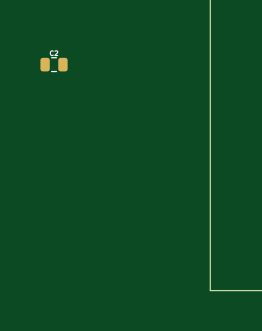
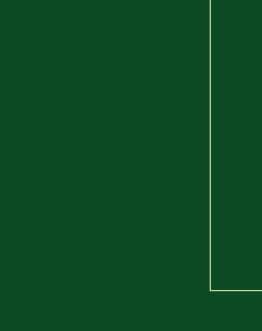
part: (54, 64) -> none

